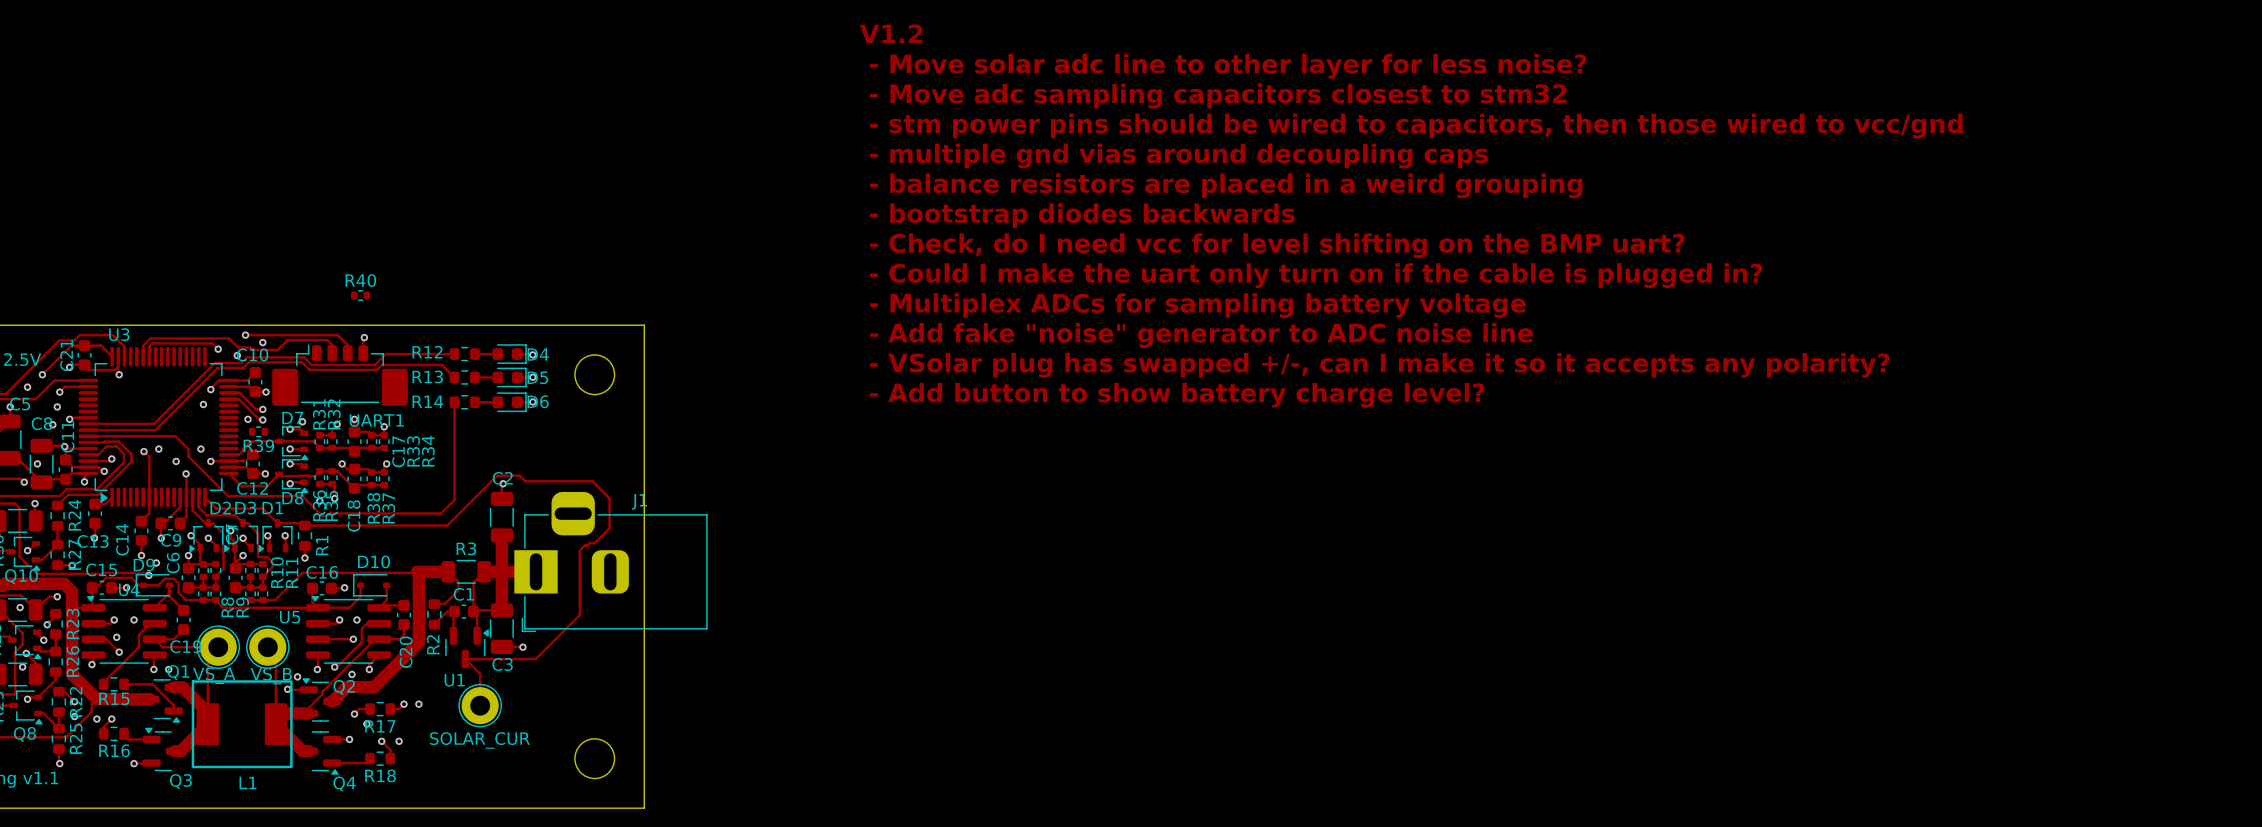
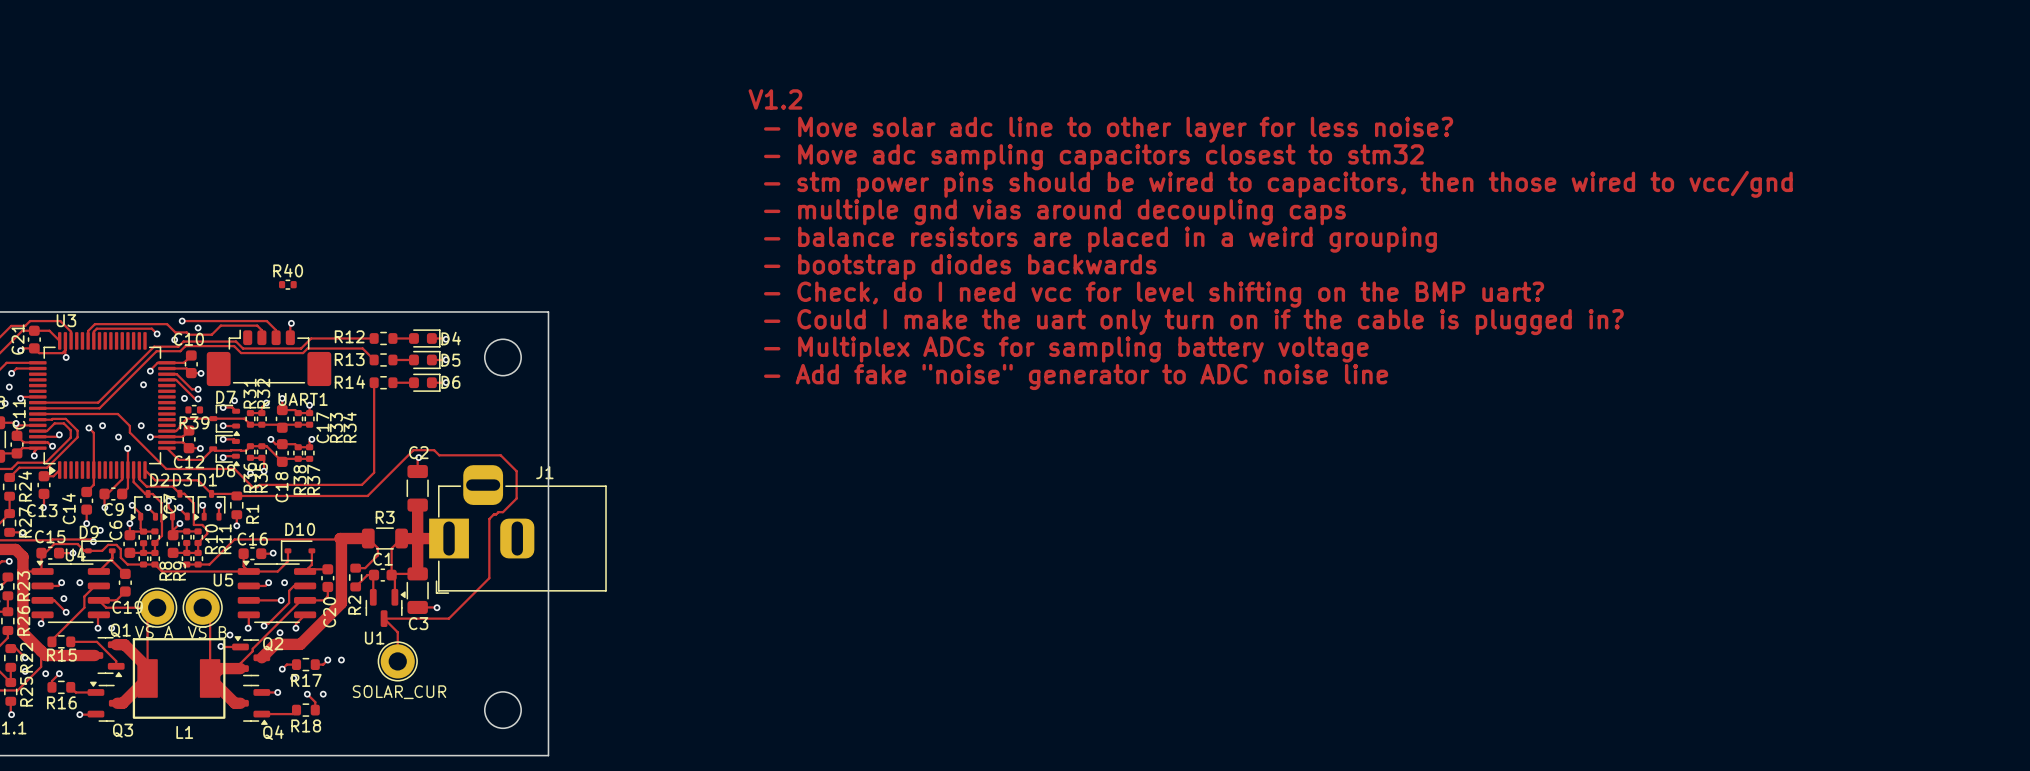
text: V1.2 (891, 33) -> none
text: - Move solar adc line to other layer for less noise? (1228, 66) -> none
text: - Move adc sampling capacitors closest to stm32 (1218, 96) -> V1.2 (775, 99)
text: - stm power pins should be wired to capacitors, then those wired to vcc/gnd (1416, 126) -> - Move solar adc line to other layer for less noise? (1108, 129)
text: - multiple gnd vias around decoupling caps (1179, 156) -> - Move adc sampling capacitors closest to stm32 (1093, 157)
text: - balance resistors are placed in a weird grouping (1226, 185) -> - stm power pins should be wired to capacitors, then those wired to vcc/gnd (1278, 184)
text: - bootstrap diodes backwards (1082, 215) -> - multiple gnd vias around decoupling caps (1054, 212)
text: - Check, do I need vcc for level shifting on the BMP uart? (1277, 245) -> - balance resistors are placed in a weird grouping (1100, 239)
text: - Could I make the uart only turn on if the cable is plugged in? (1316, 275) -> - bootstrap diodes backwards (960, 267)
text: - Multiplex ADCs for sampling battery voltage (1197, 305) -> - Check, do I need vcc for level shifting on the BMP uart? (1154, 294)
text: - Add fake "noise" generator to ADC noise line (1201, 335) -> - Could I make the uart only turn on if the cable is plugged in? (1193, 322)
text: - VSolar plug has swapped +/-, can I make it so it accepts any polarity? (1379, 365) -> - Multiplex ADCs for sampling battery voltage (1066, 349)
text: - Add button to show battery charge level? (1177, 395) -> - Add fake "noise" generator to ADC noise line (1076, 377)

